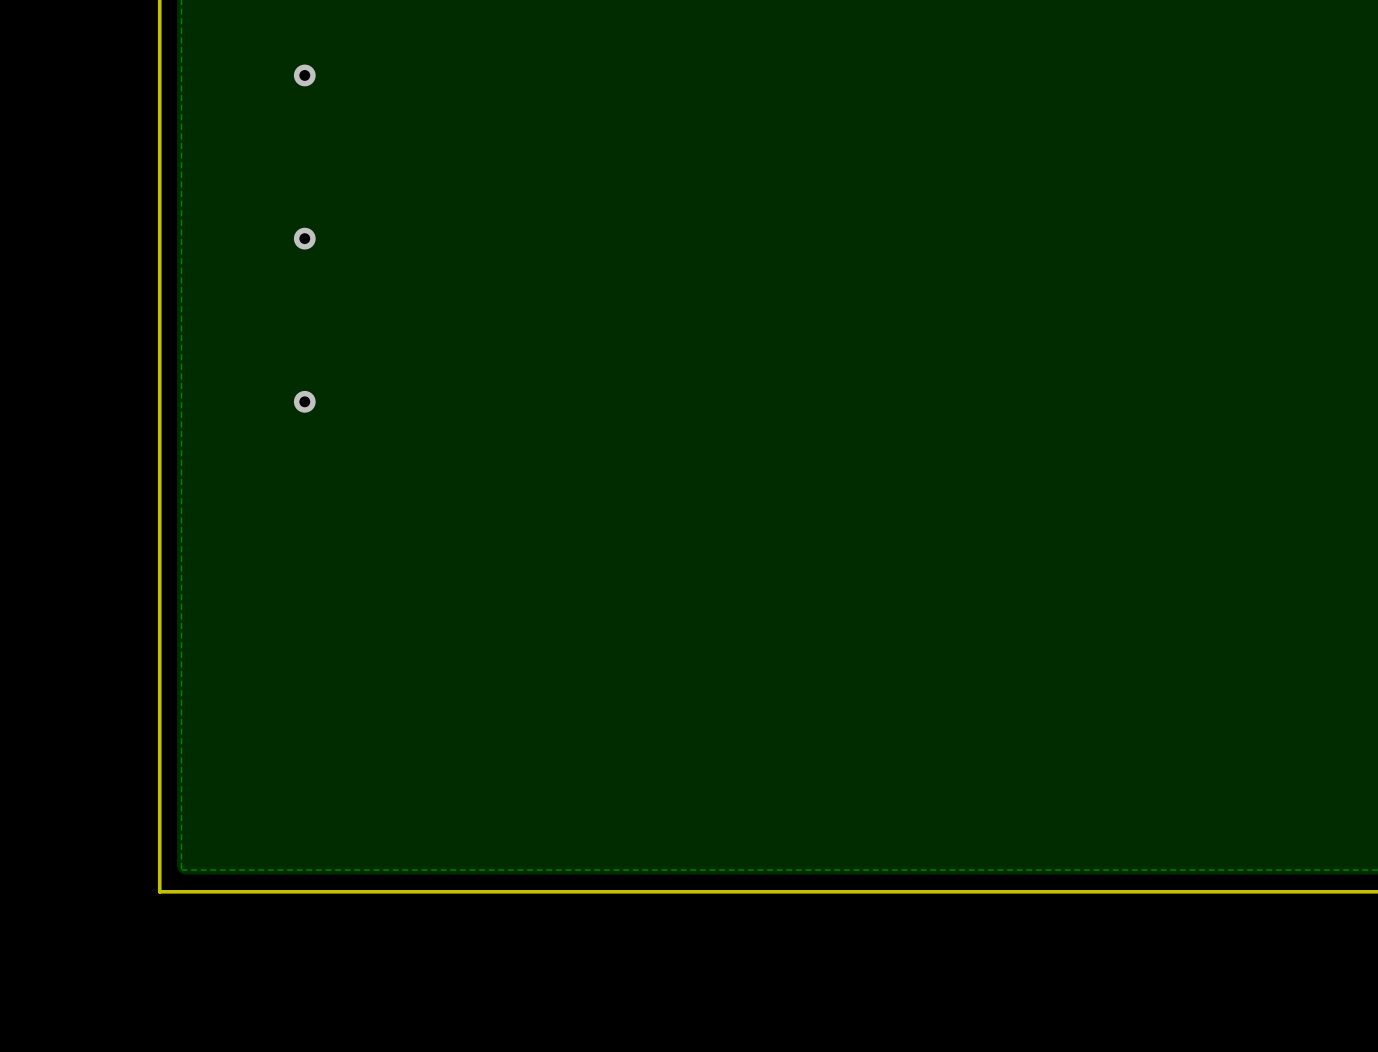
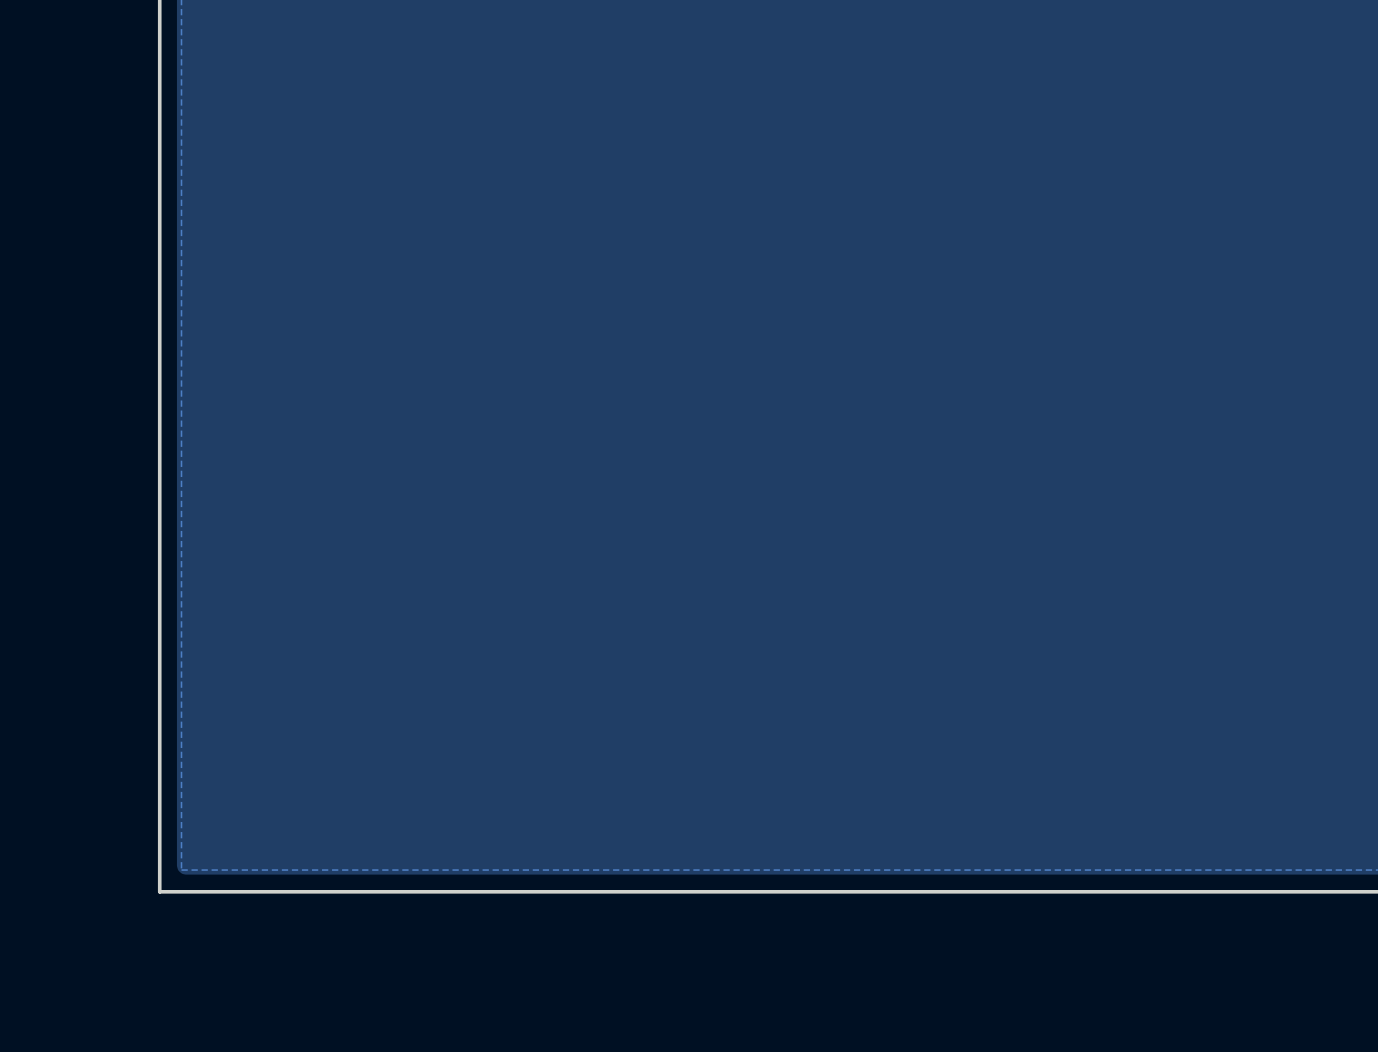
via: (304, 75) -> none
via: (304, 238) -> none
via: (304, 401) -> none

